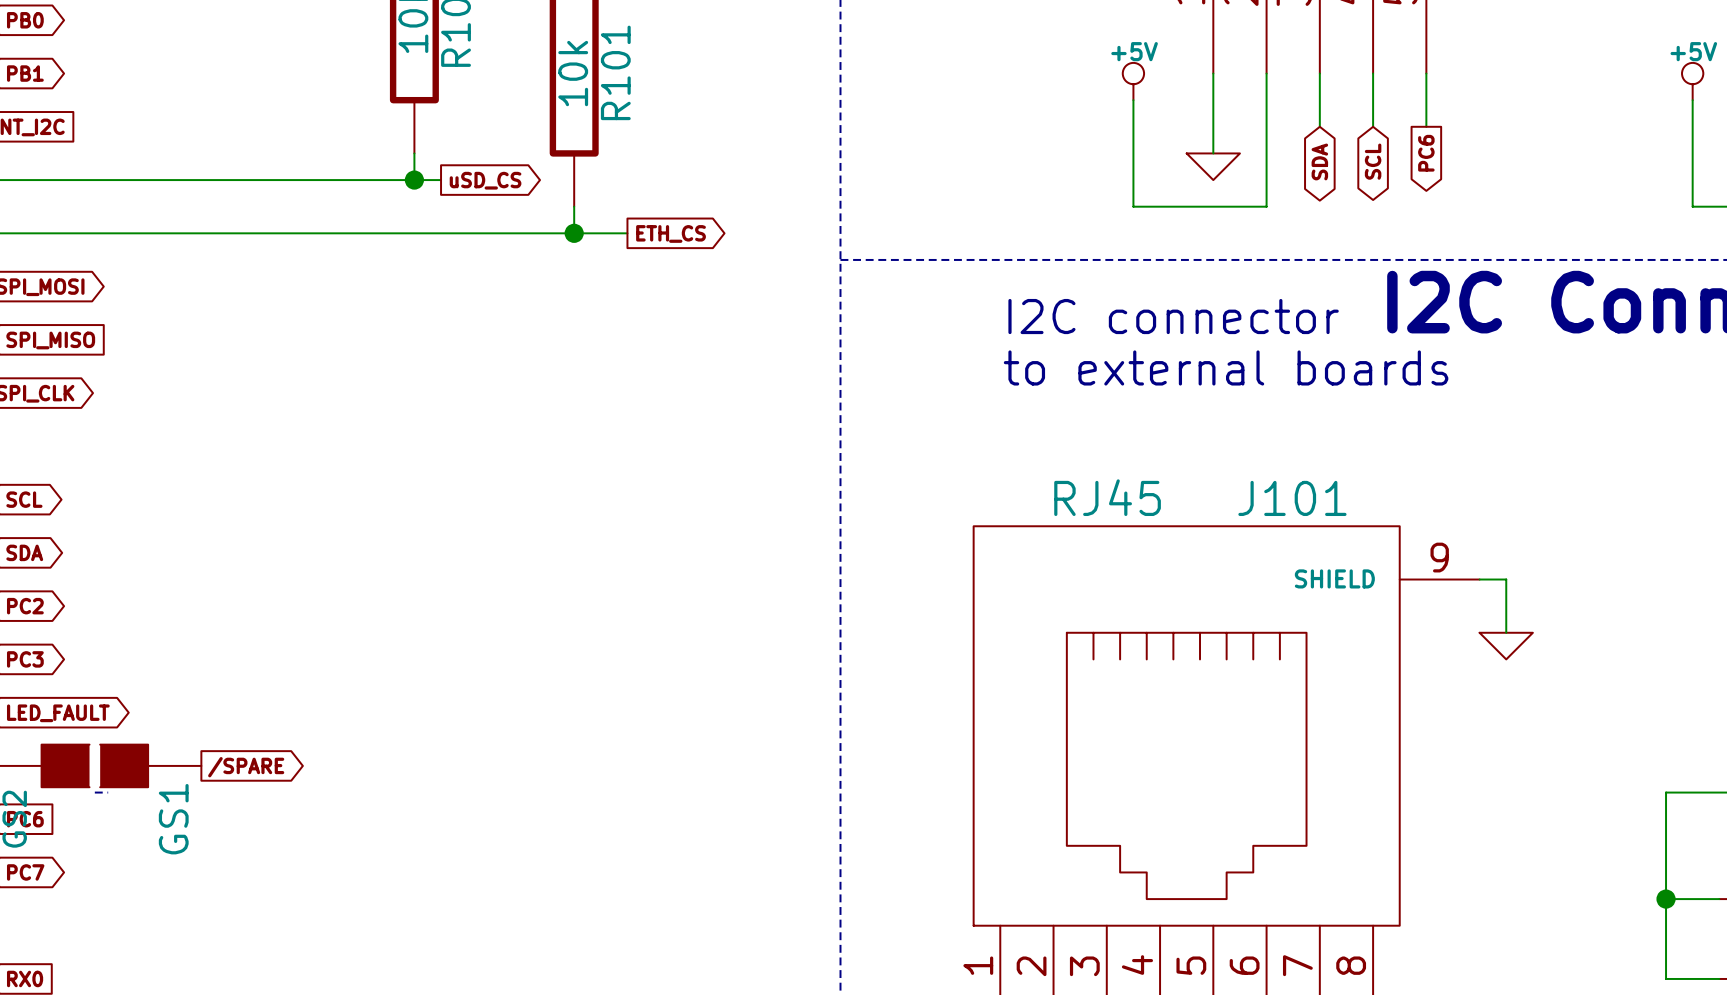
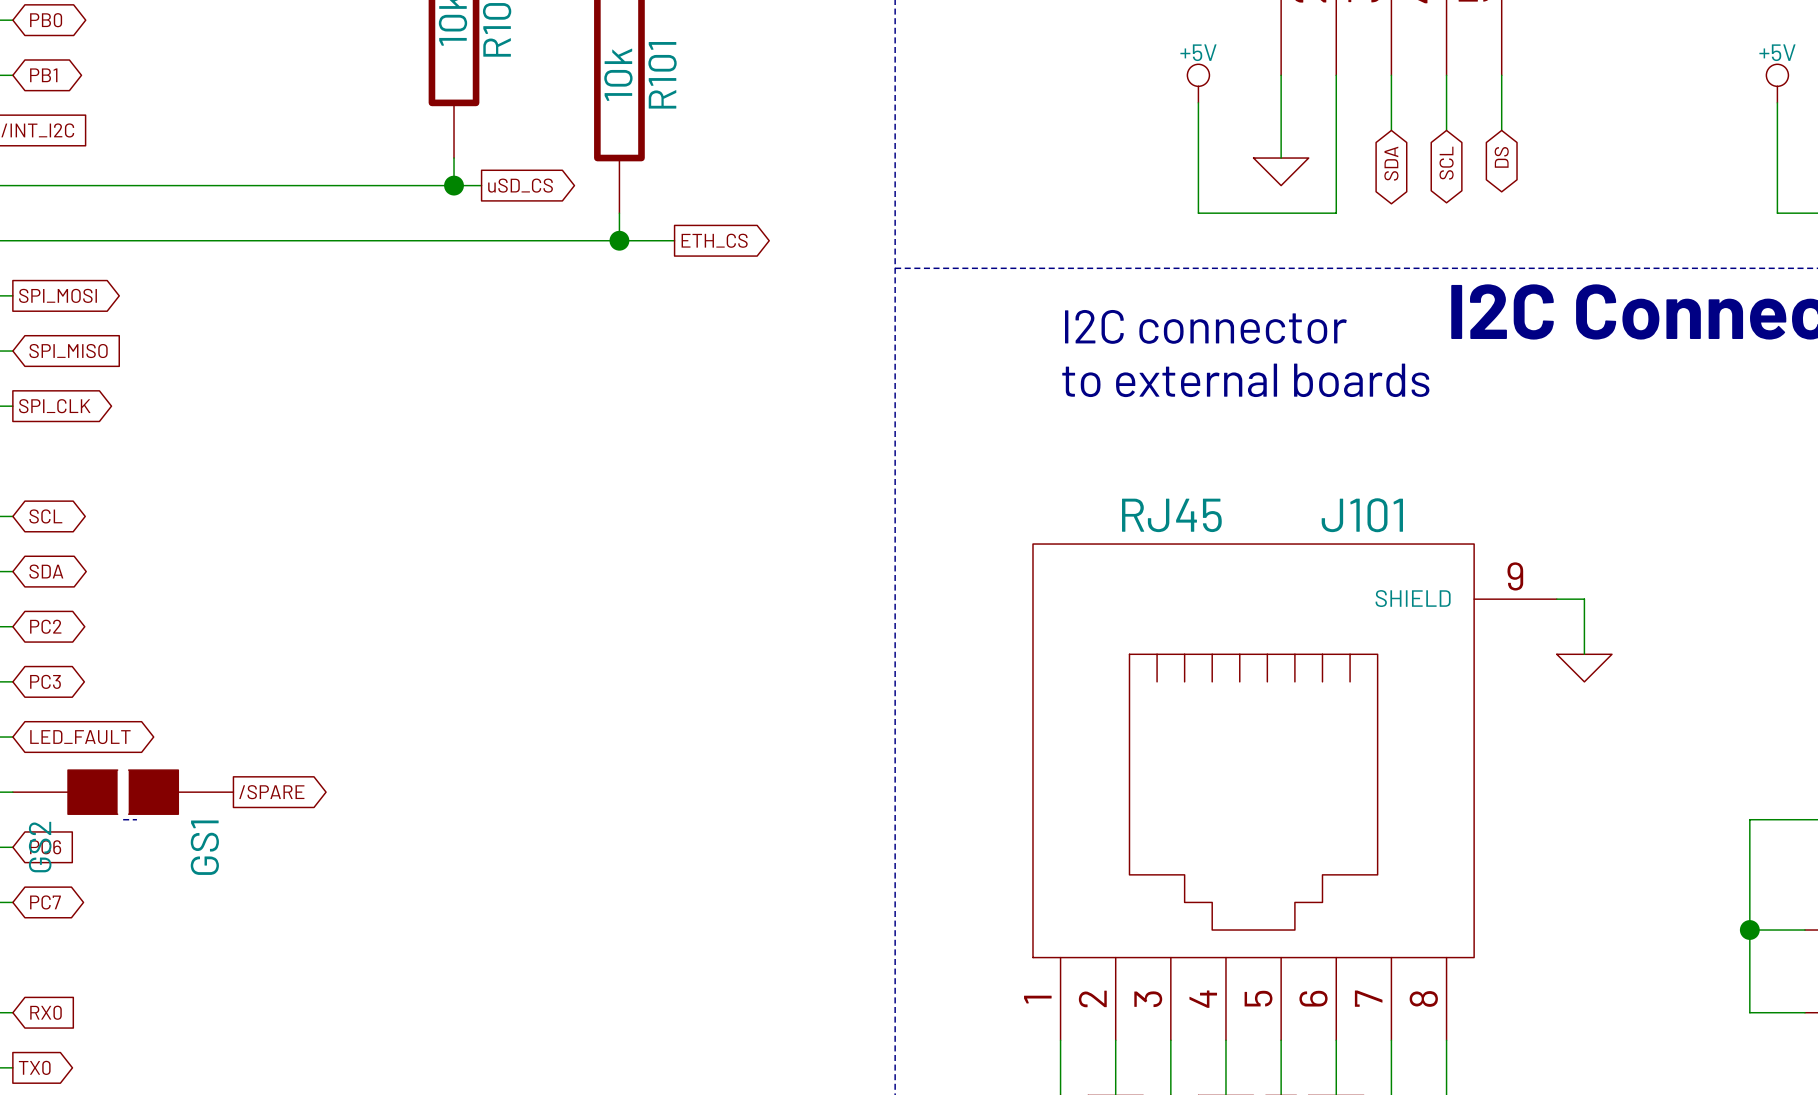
global label shape: output (1426, 153) -> bidirectional (1501, 157)
global label: PC6 (1426, 153) -> DS (1501, 157)

